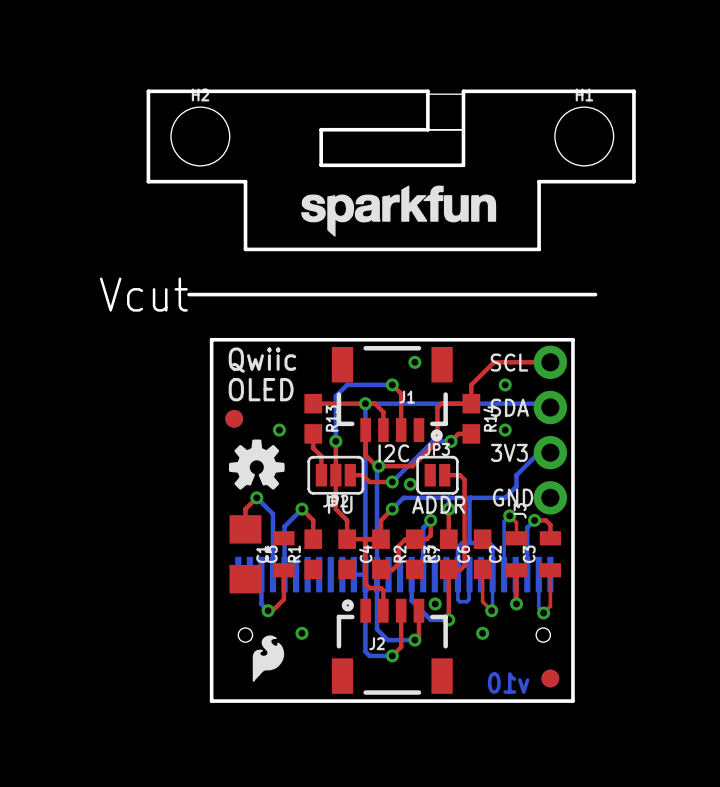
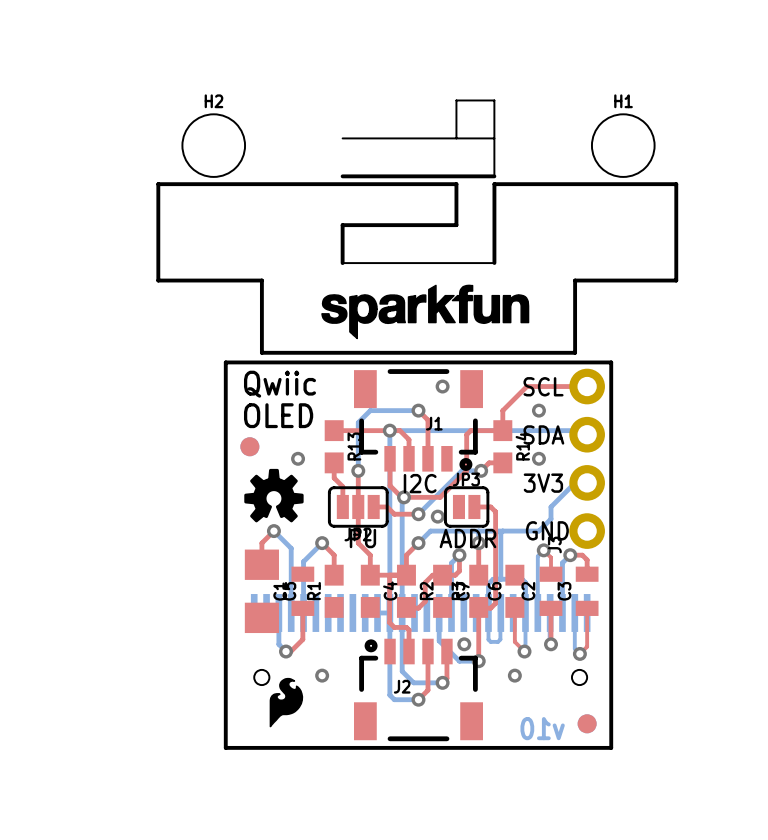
board edge: (321, 129) (427, 129) (427, 91) (148, 91) (148, 172) -> (342, 225) (456, 225) (456, 184) (158, 184)
board edge: (321, 129) (321, 165) -> (342, 225) (342, 263)
board edge: (321, 165) (463, 165) (463, 91) (633, 91) (633, 172) -> (342, 263) (494, 262) (494, 184) (676, 184)
board edge: (148, 181) (245, 181) (245, 249) (539, 249) (539, 181) (633, 181) -> (158, 193) (158, 280) (261, 280) (261, 352) (575, 352) (575, 280) (676, 280) (676, 193)
drawing position: (398, 211) -> (425, 311)
text: Vcut (143, 294) -> none
board edge: (189, 294) (595, 294) -> none

